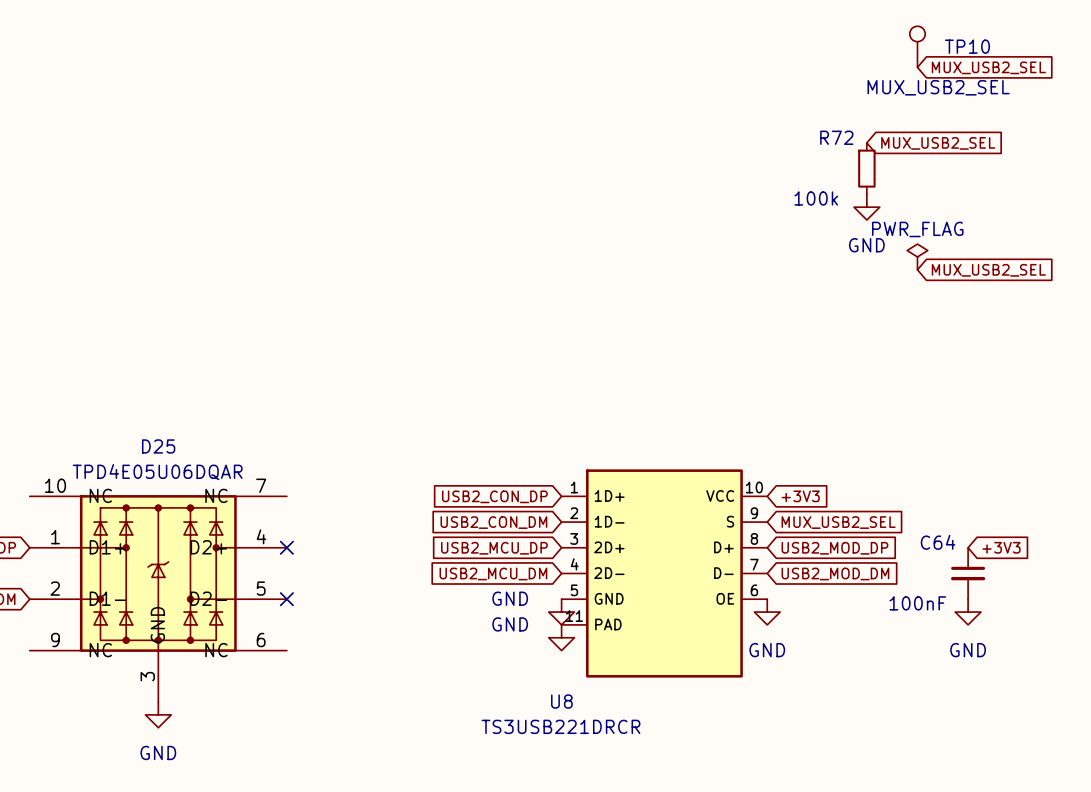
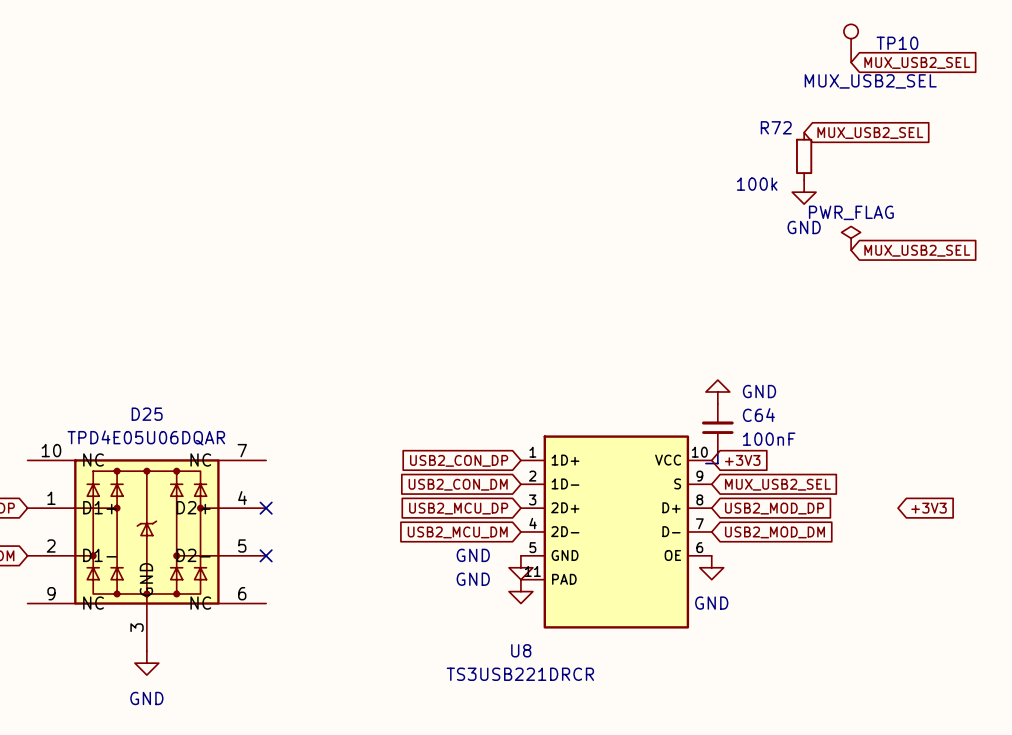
power symbol: none -> GND (717, 391)
wire: none -> (717, 451) (717, 463) (705, 463)
C64 name position: C64 (938, 542) -> C64 (758, 415)
C64 rotation: 0° (968, 573) -> 180° (717, 427)
C64 position: (968, 573) -> (717, 427)
C64 value position: 100nF (917, 603) -> 100nF (769, 439)
power symbol: GND (968, 612) -> none

